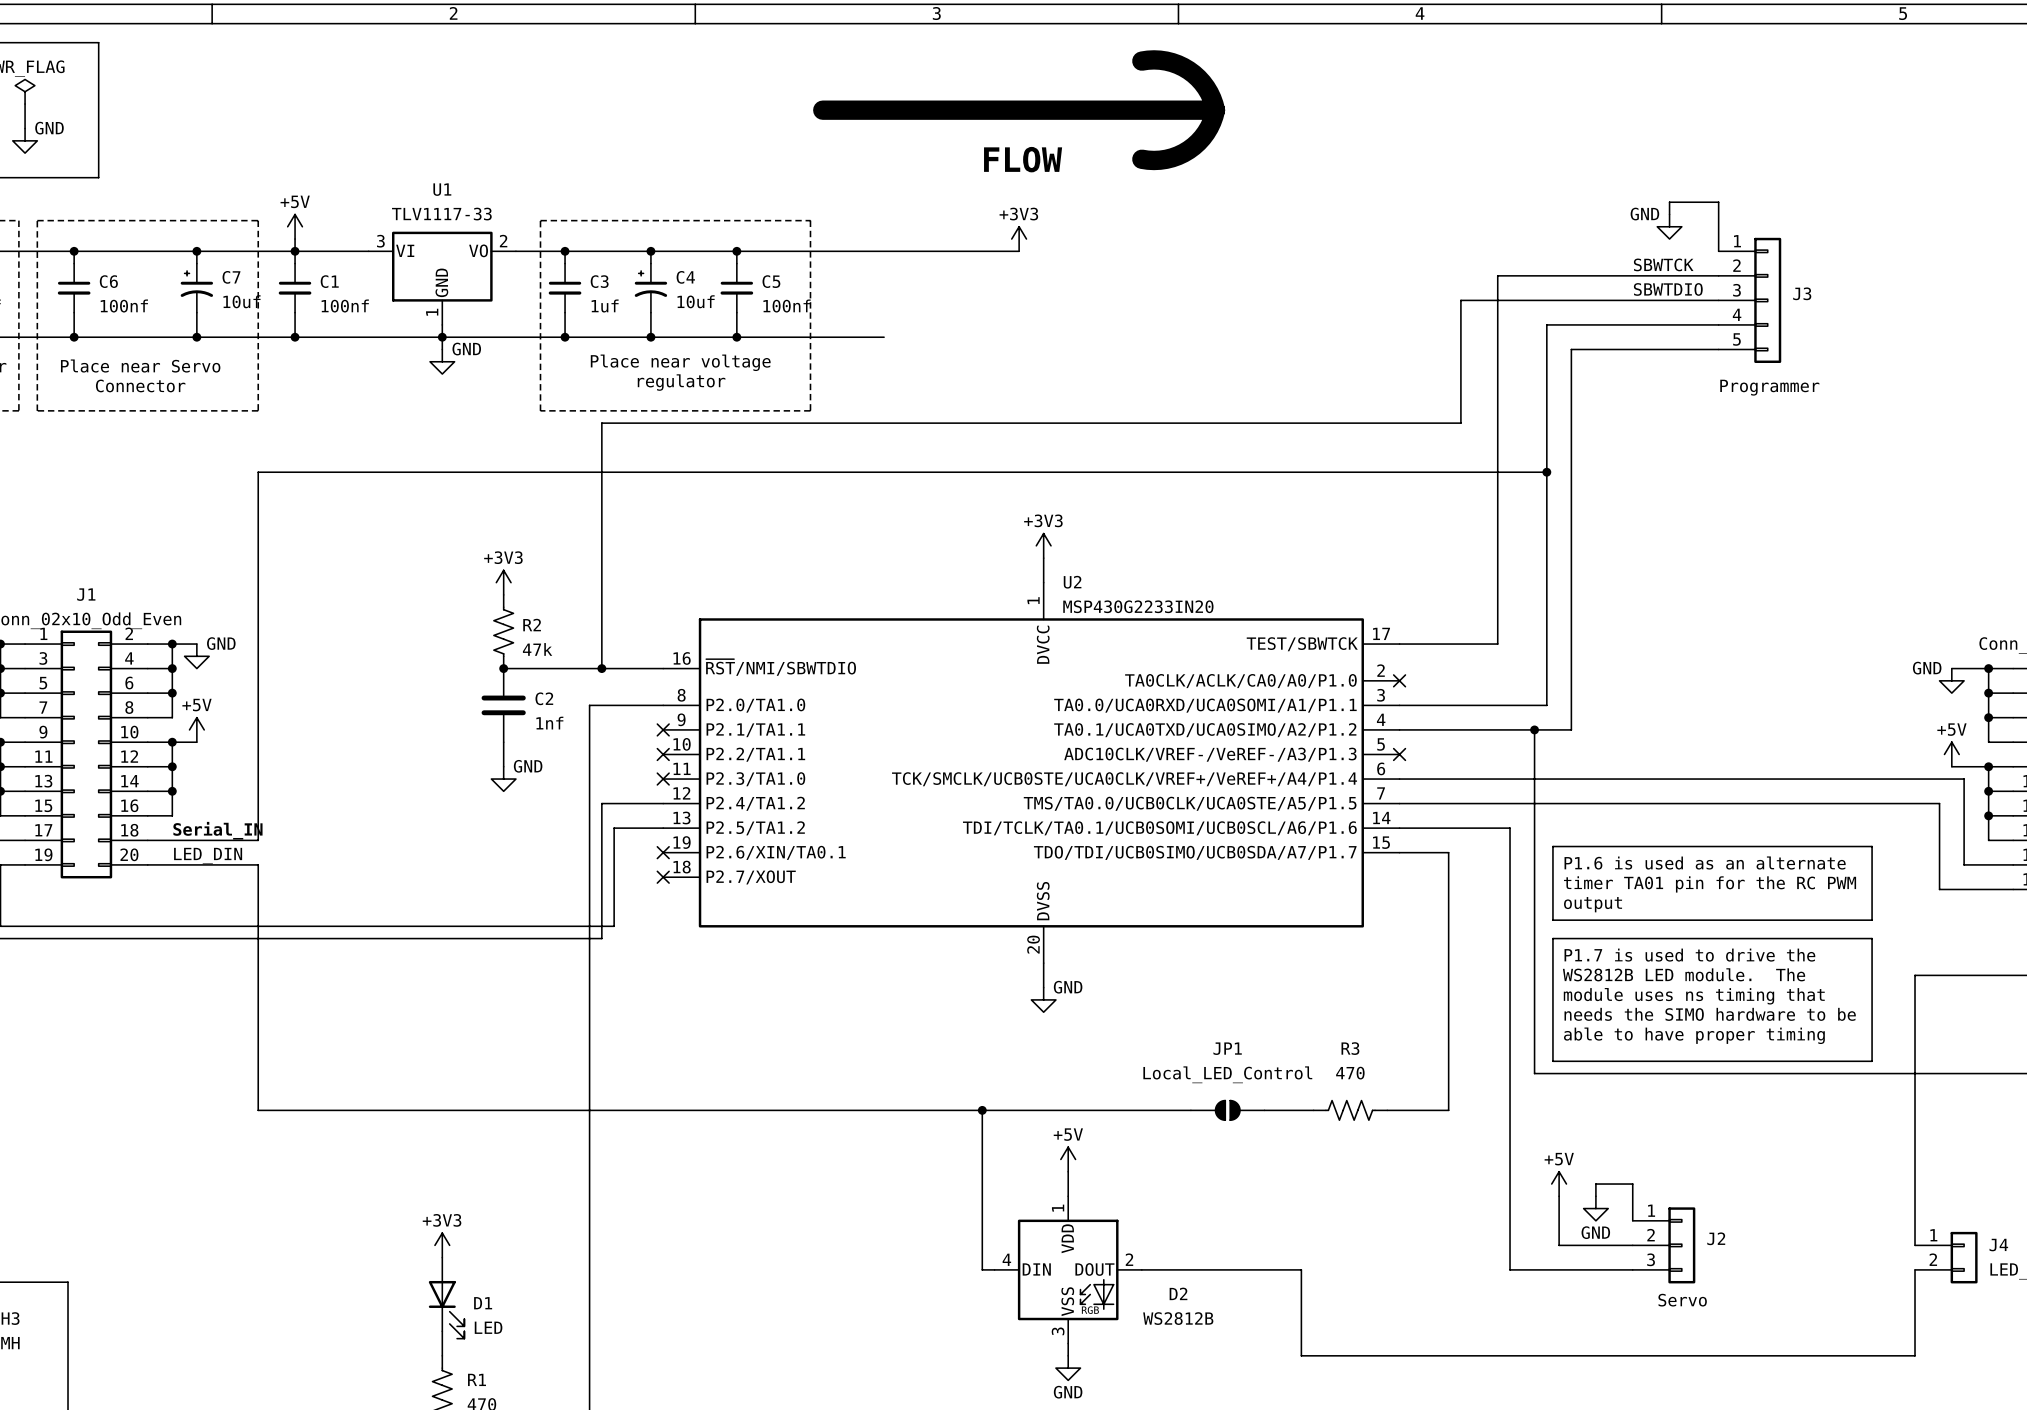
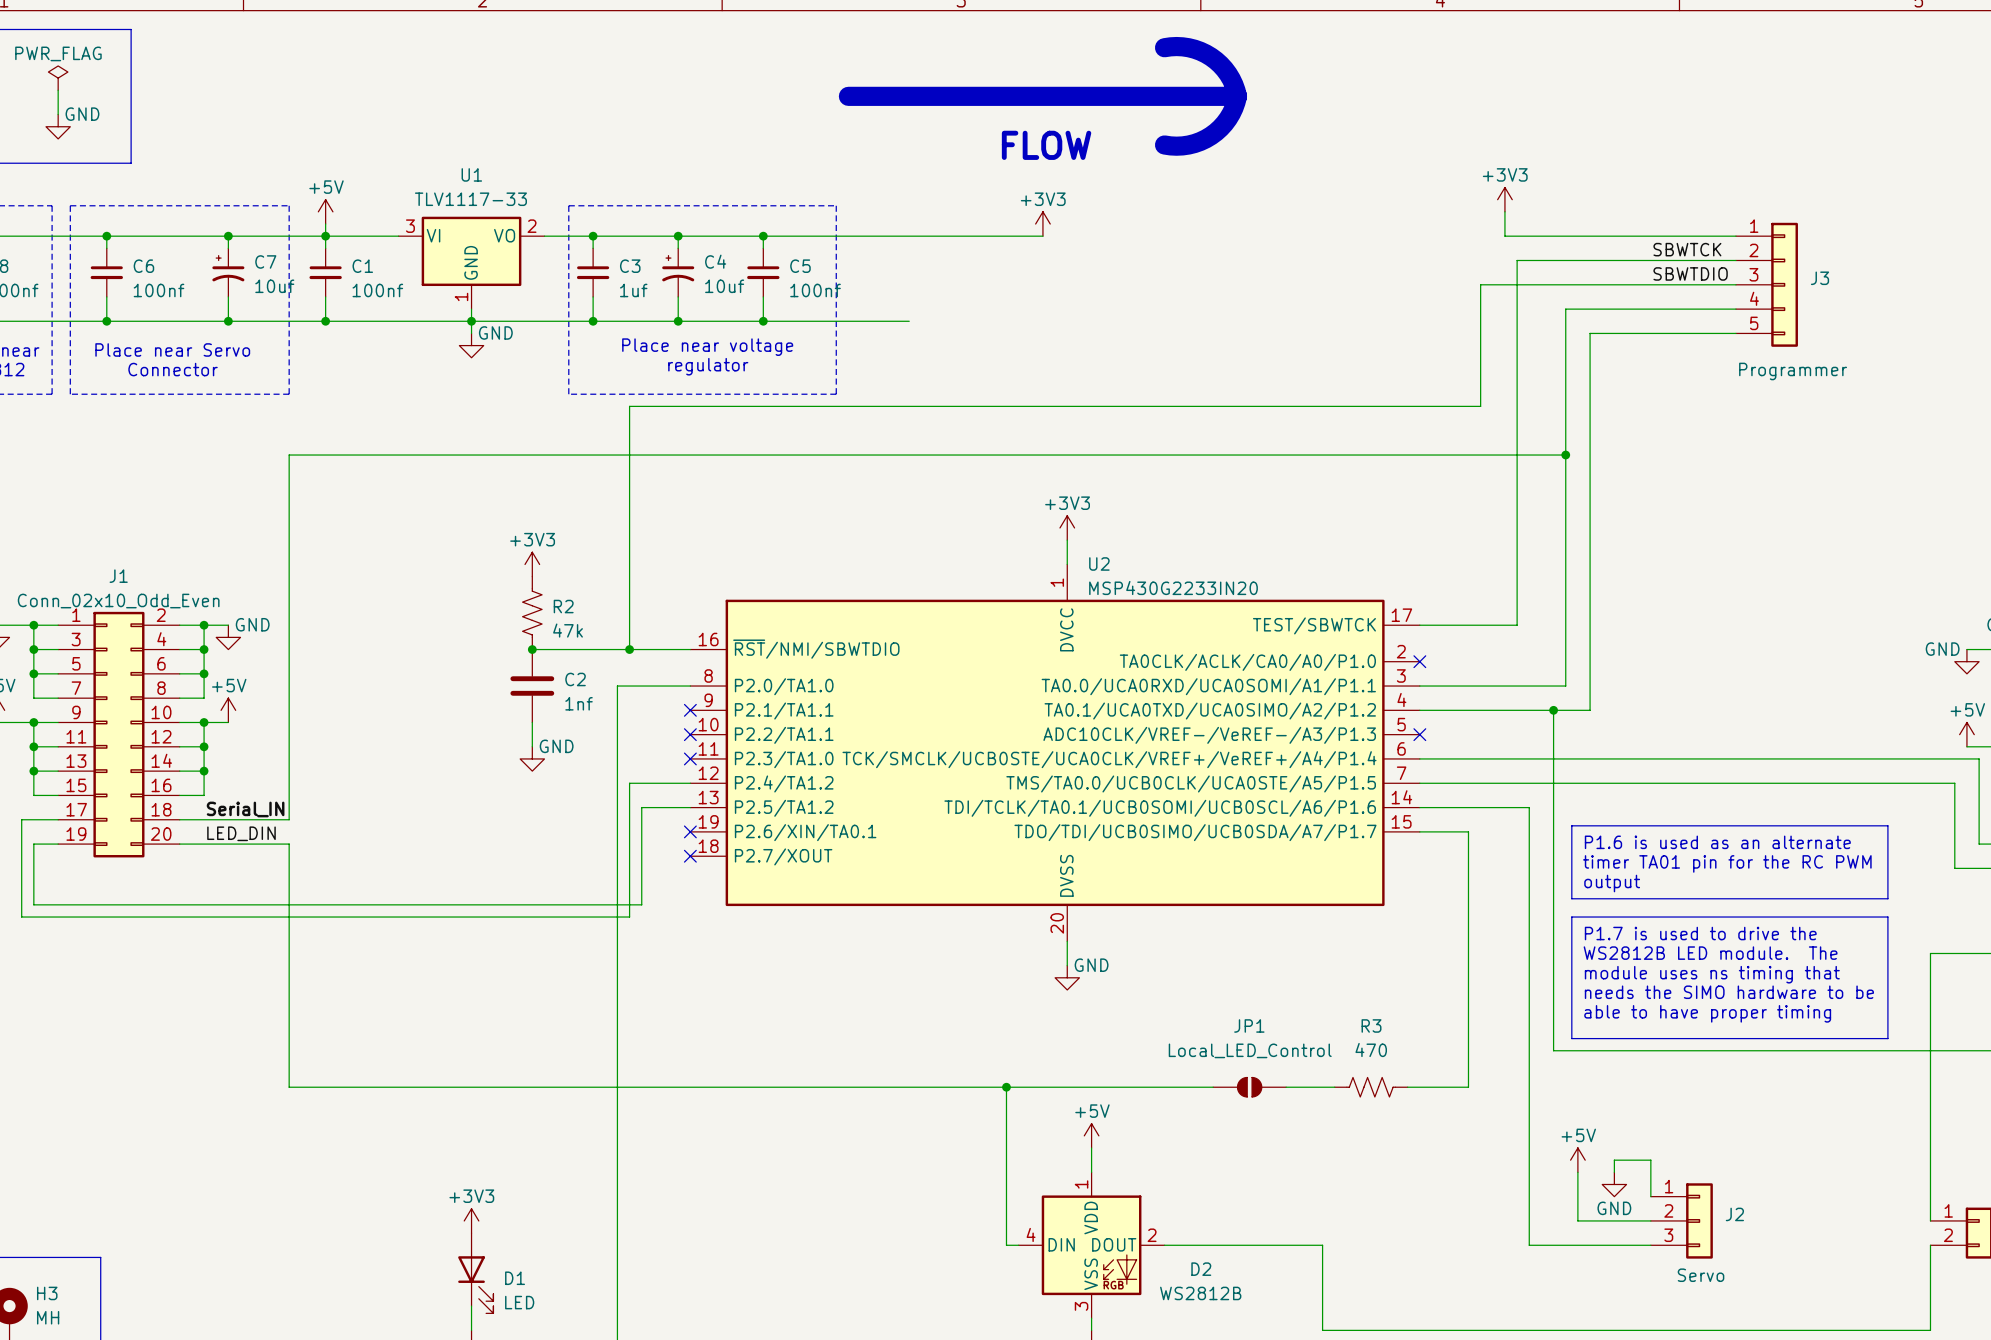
power symbol: none -> +3V3 (1504, 199)
wire: (1669, 214) (1669, 202) (1718, 202) (1718, 251) -> (1504, 211) (1504, 236) (1735, 236)
power symbol: GND (1669, 226) -> none

